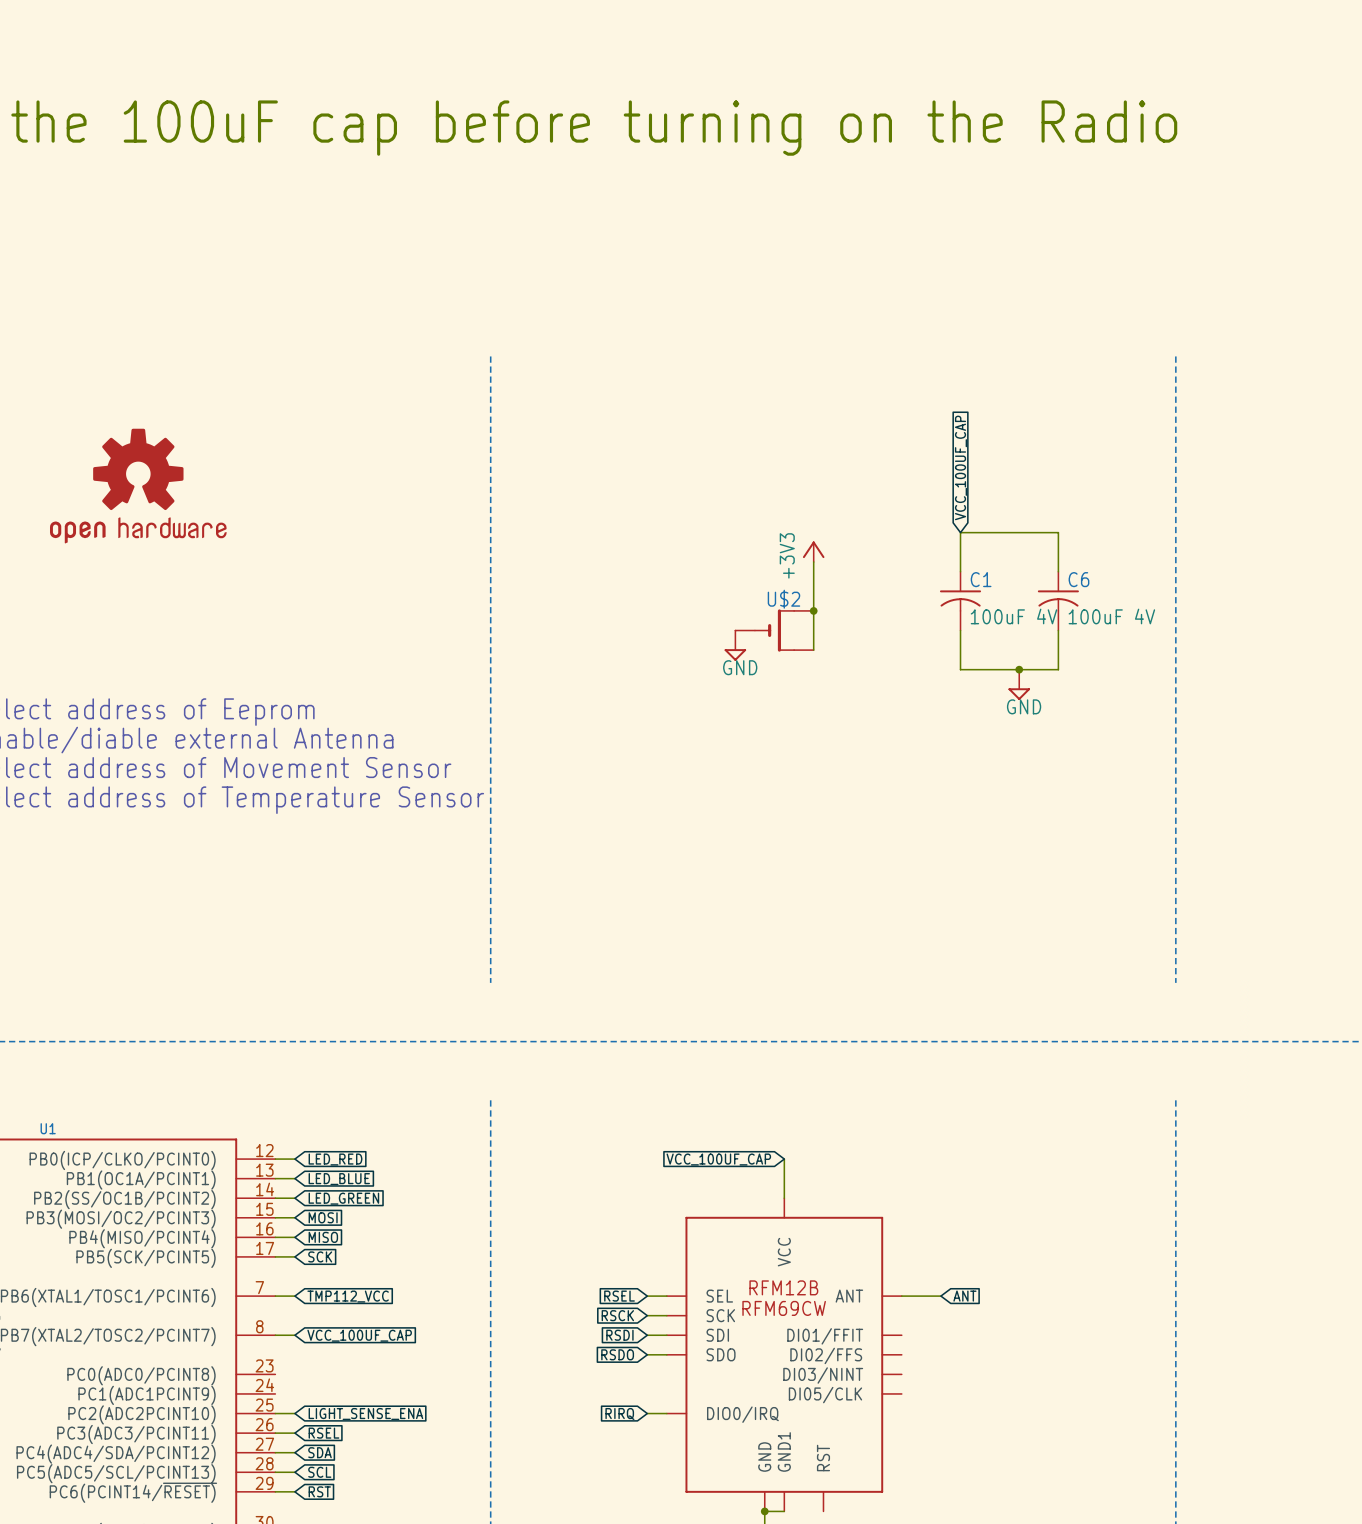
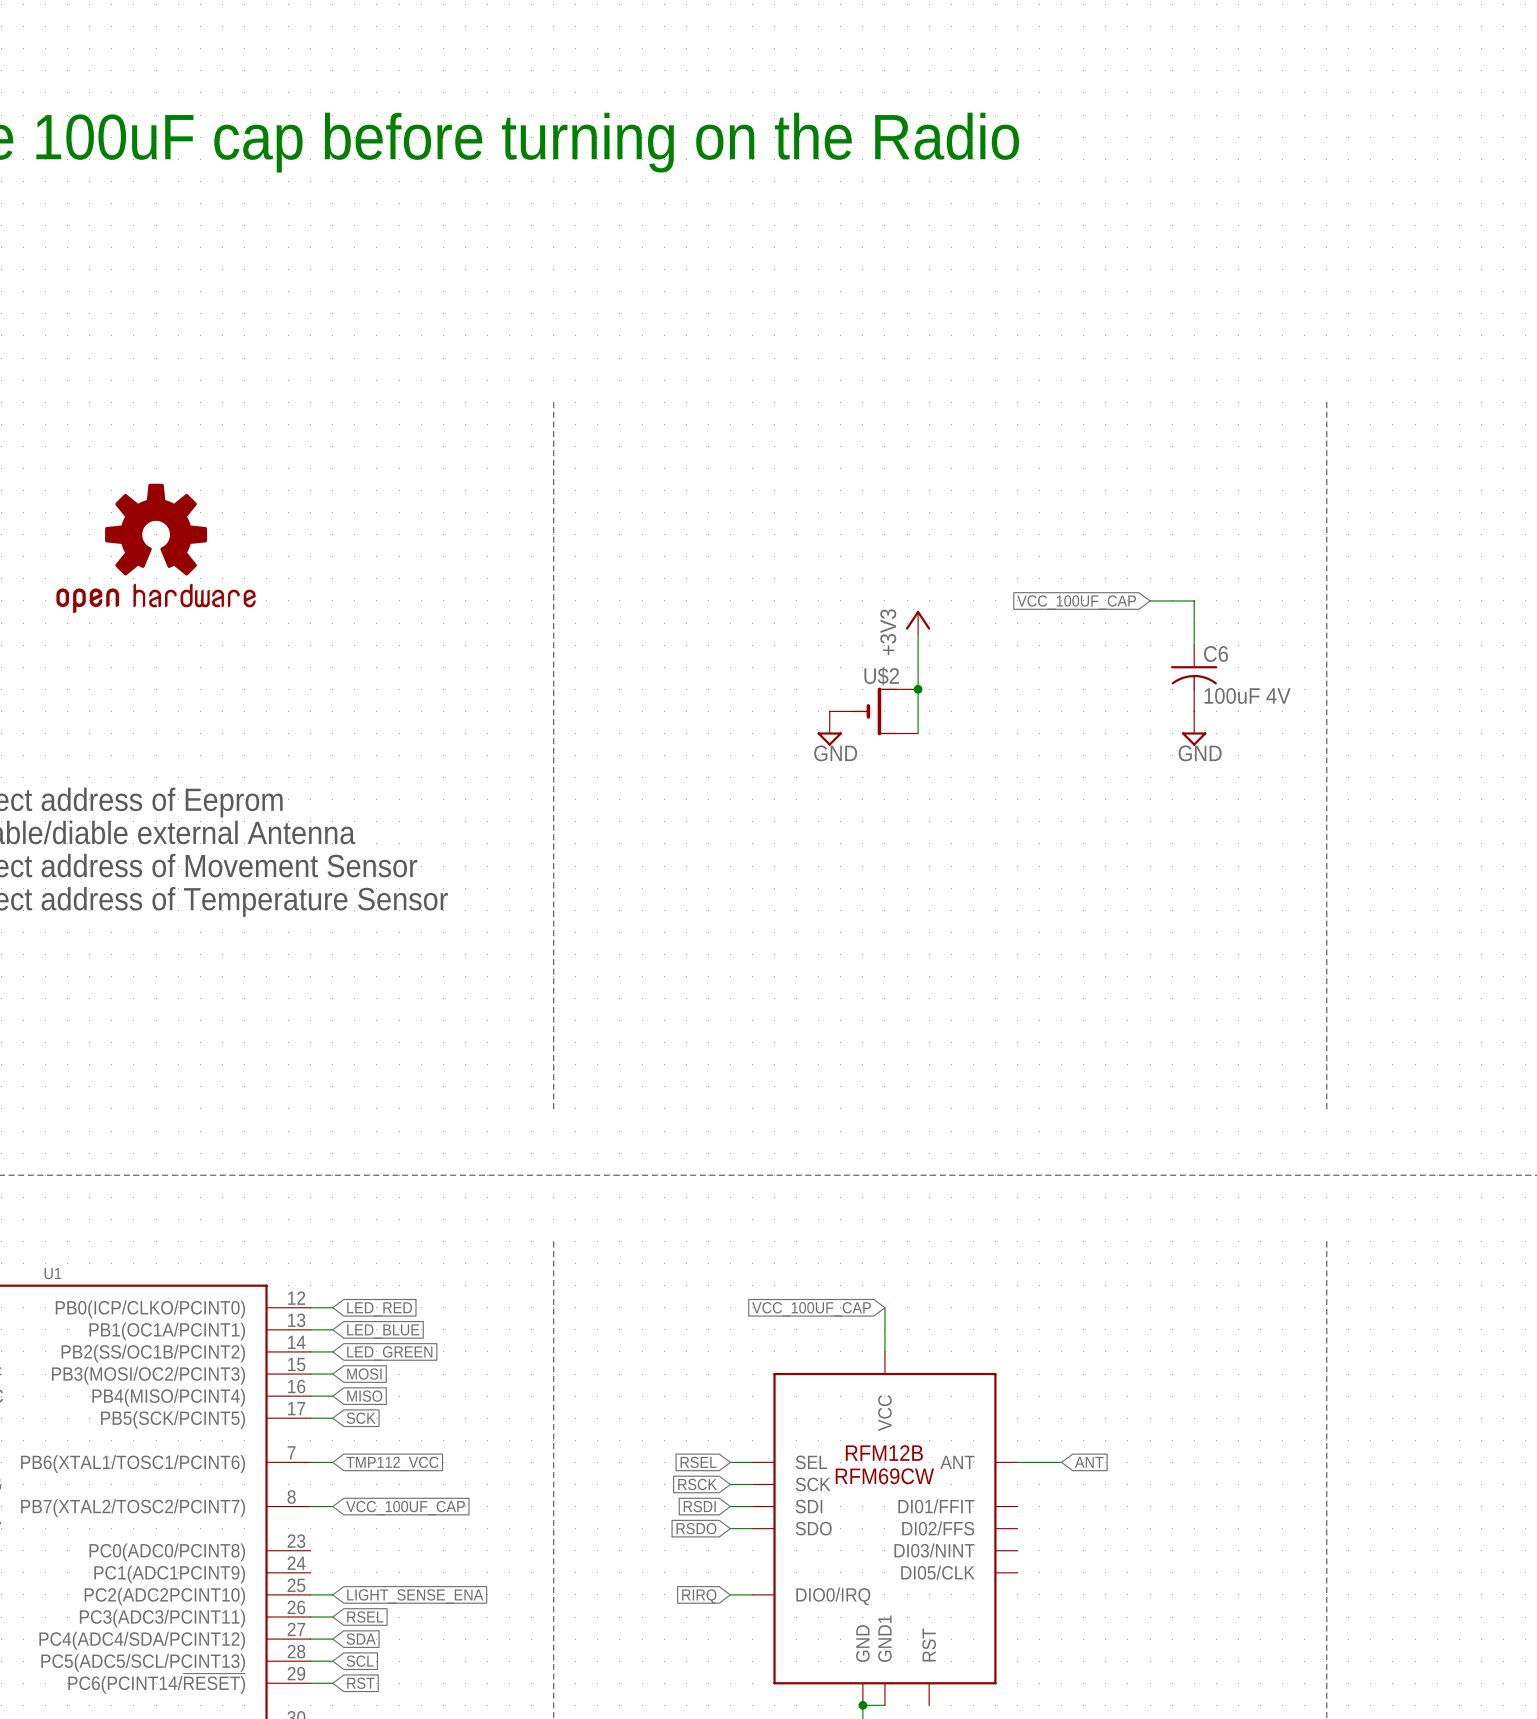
global label rotation: 0° (960, 467) -> 90° counterclockwise (1076, 602)
wire: (1019, 532) (960, 532) (960, 571) -> none
C1: 100uF 4V (960, 601) -> none
wire: (960, 630) (960, 669) (1058, 669) (1058, 630) -> none
junction: (1019, 669) -> none
power symbol position: GND (1019, 684) -> GND (1194, 728)

